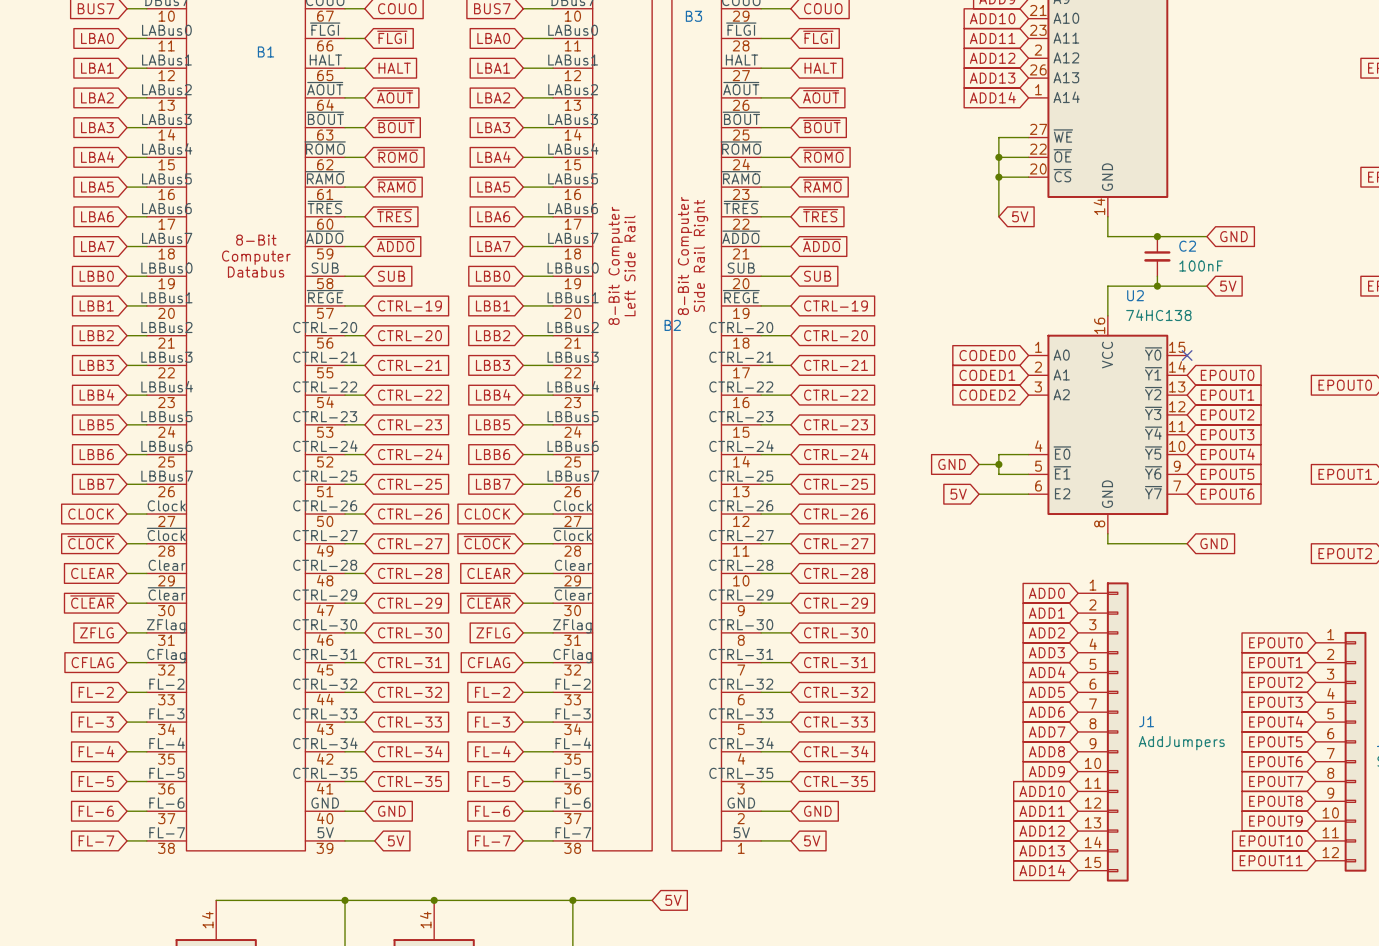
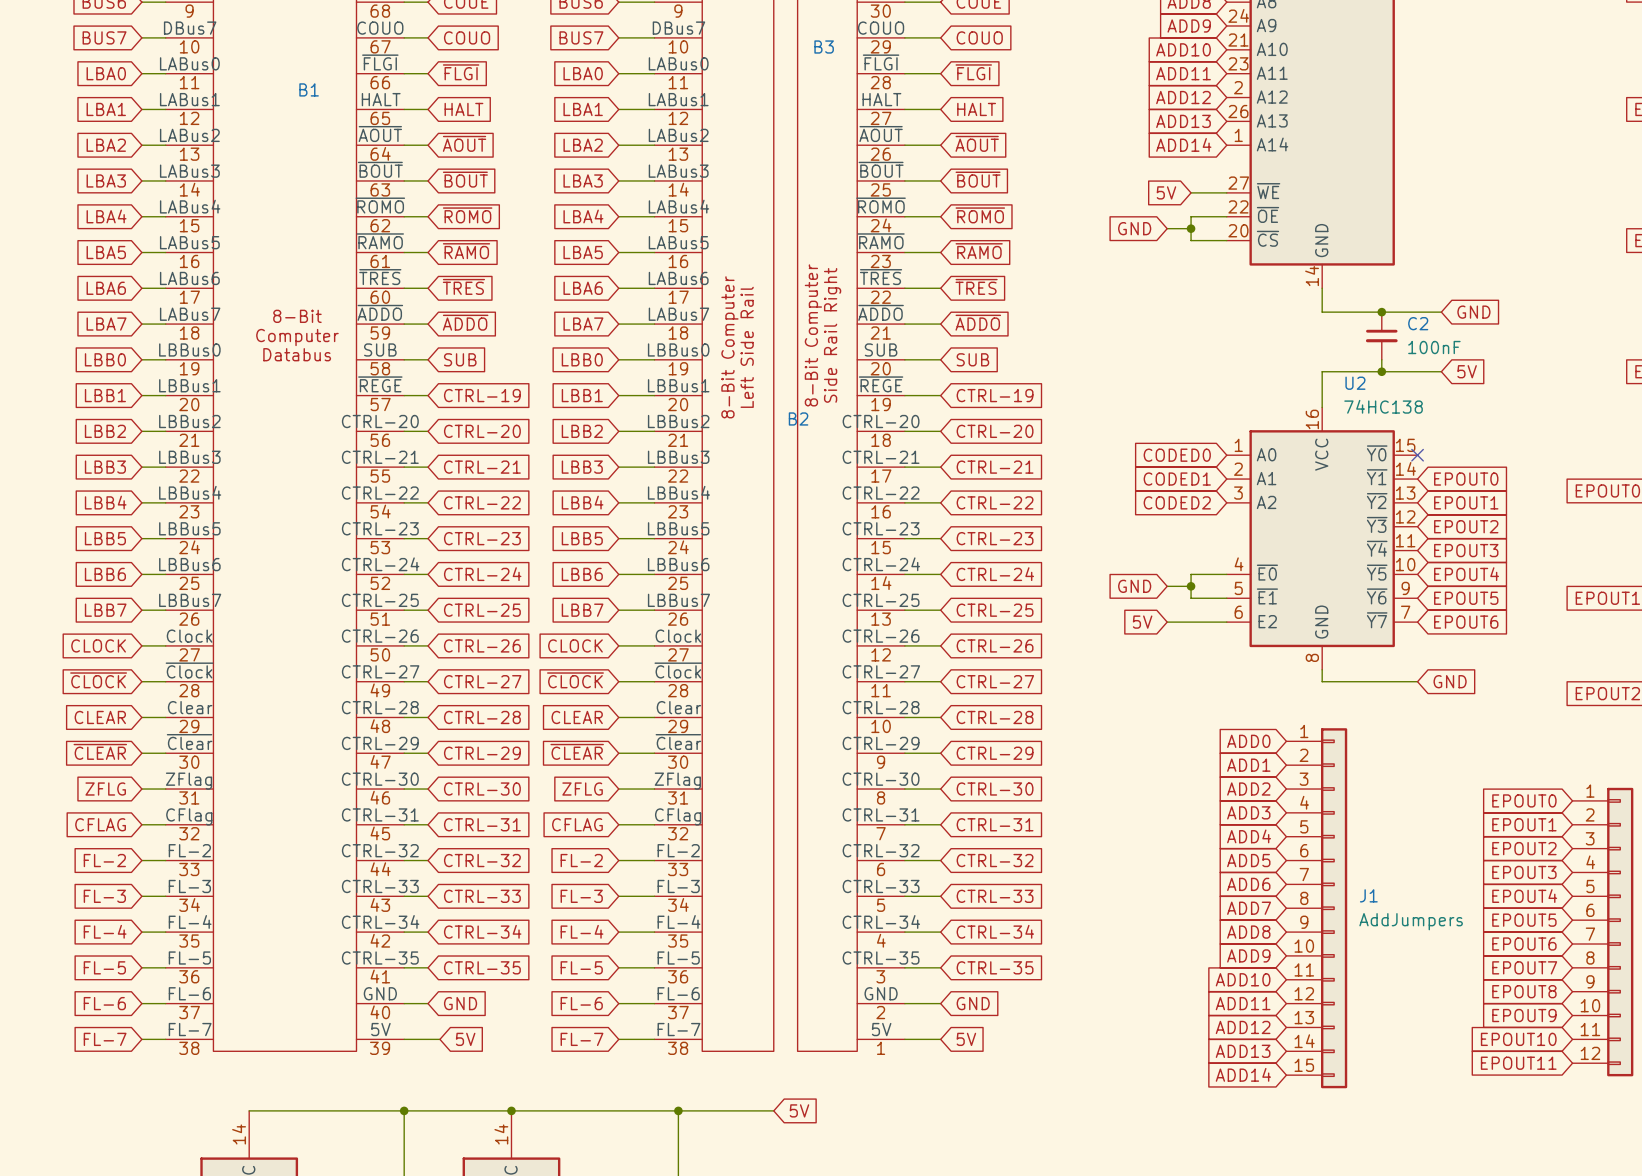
wire: (998, 137) (998, 157) -> none
junction: (998, 157) -> none
global label: none -> GND (1134, 228)
wire: none -> (1167, 228) (1191, 228)
junction: none -> (1191, 228)
wire: (998, 177) (998, 216) -> none
junction: (998, 177) -> none
global label rotation: 0° (1020, 216) -> 180° (1166, 192)
global label position: 5V (1020, 216) -> 5V (1166, 192)

